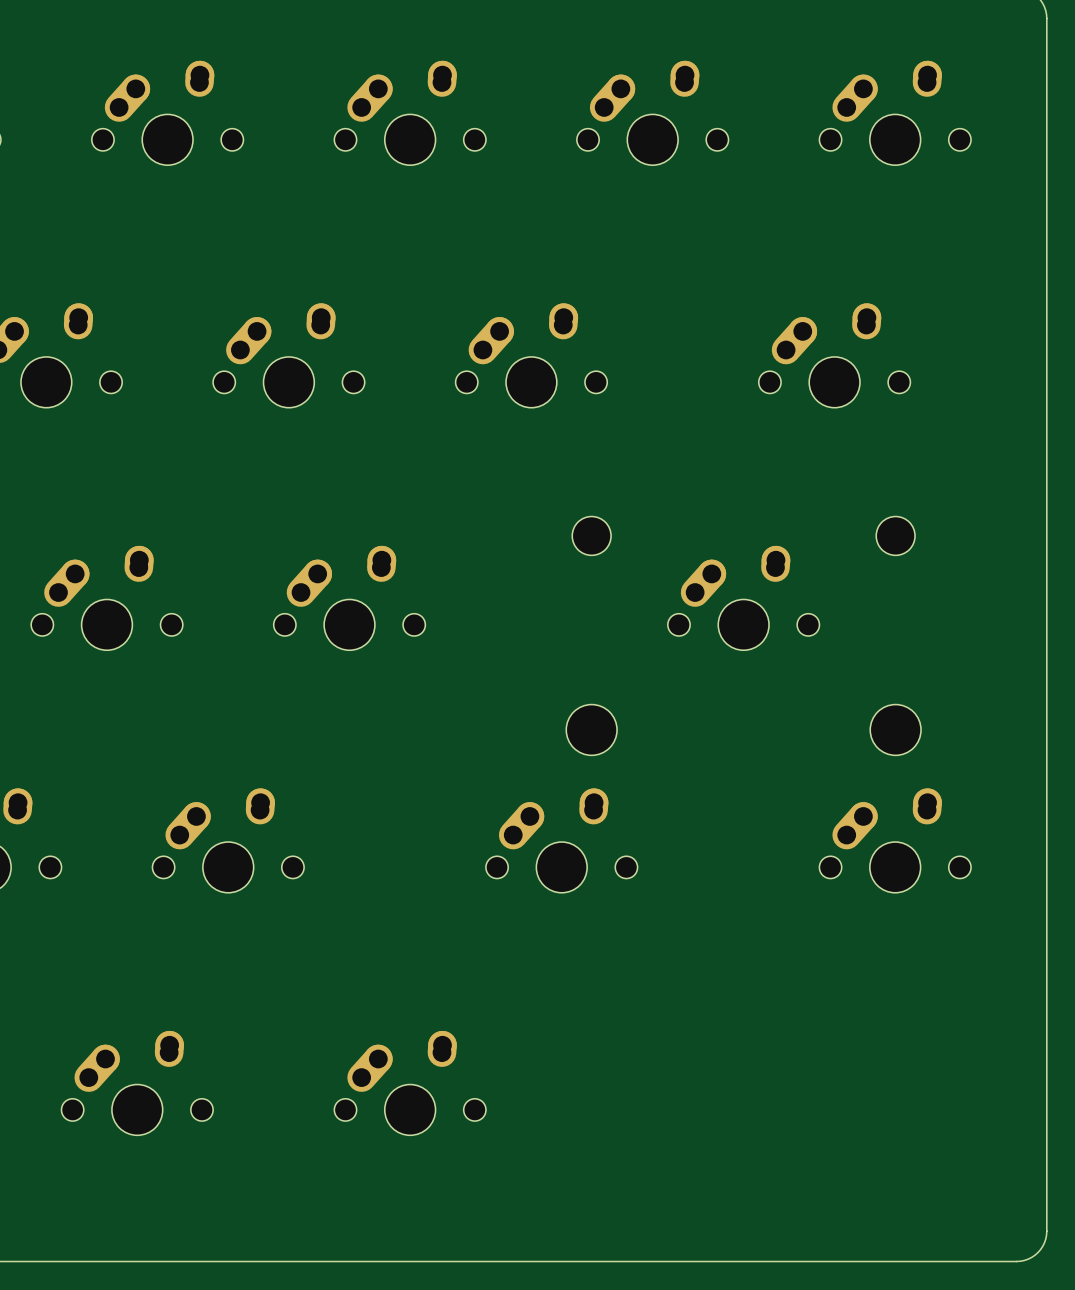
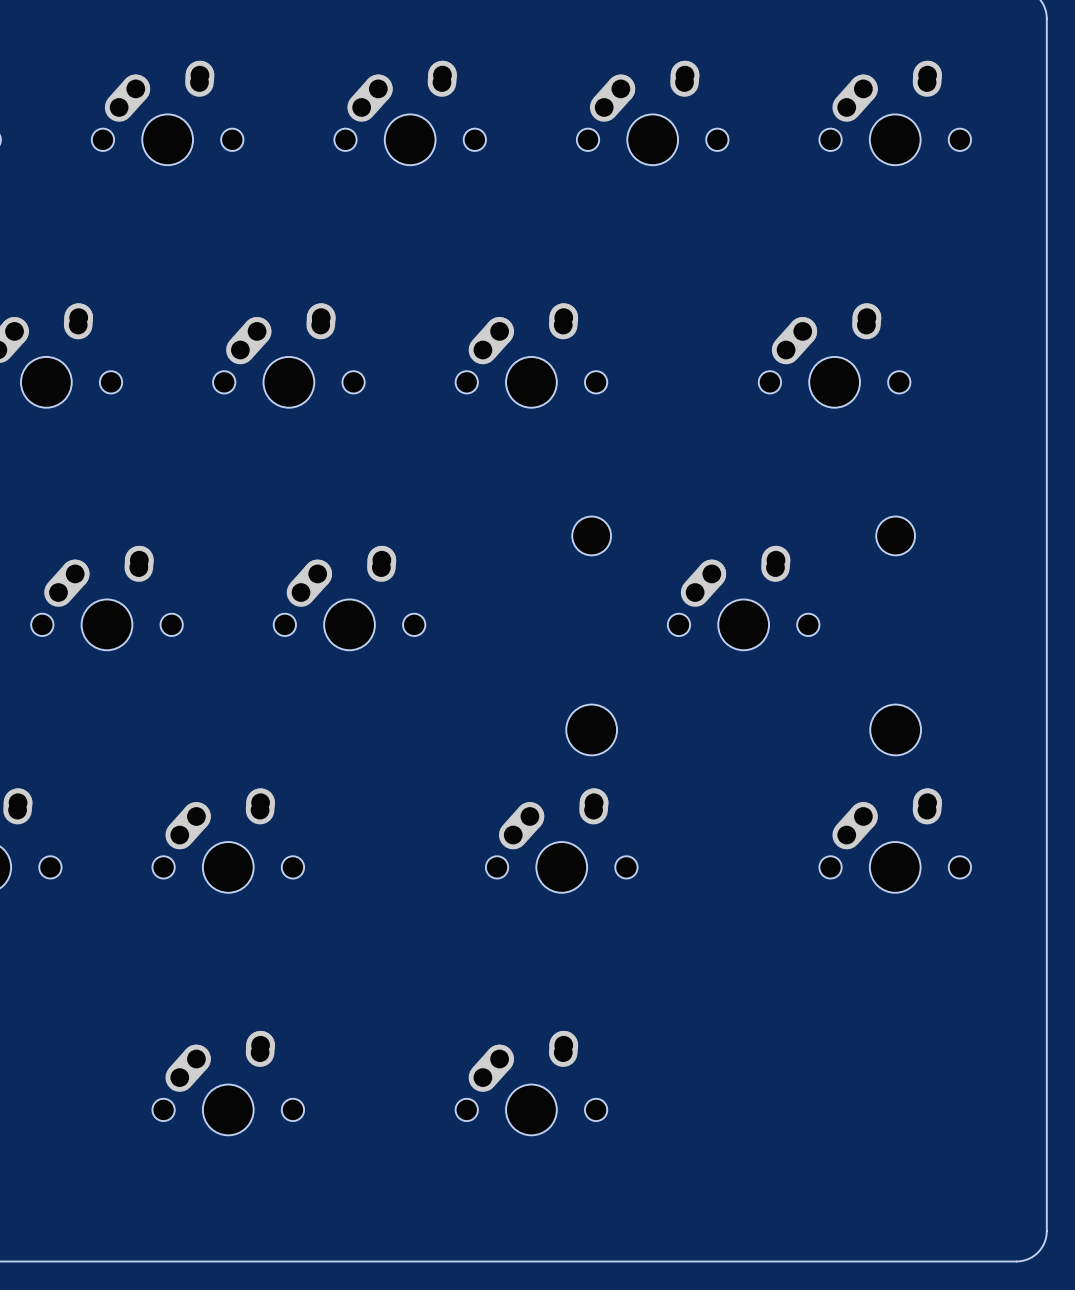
part: (137, 1083) -> none
part: none -> (228, 1083)
part: (410, 1083) -> none
part: none -> (531, 1083)

